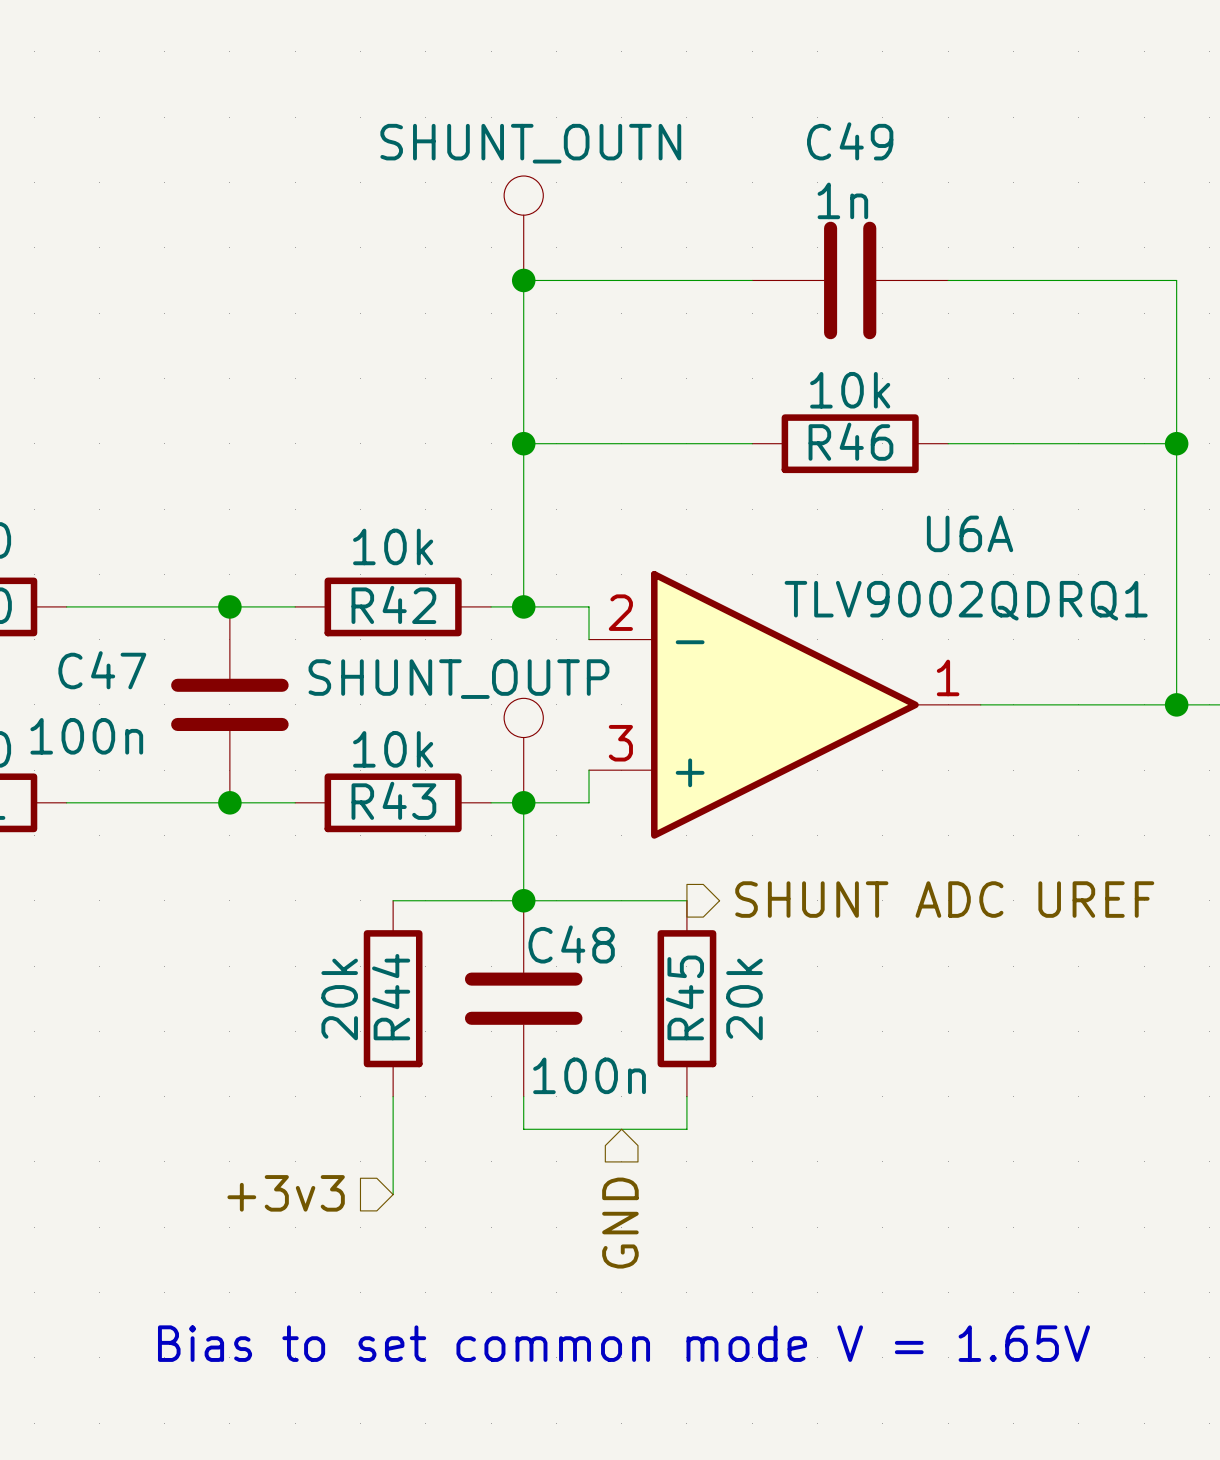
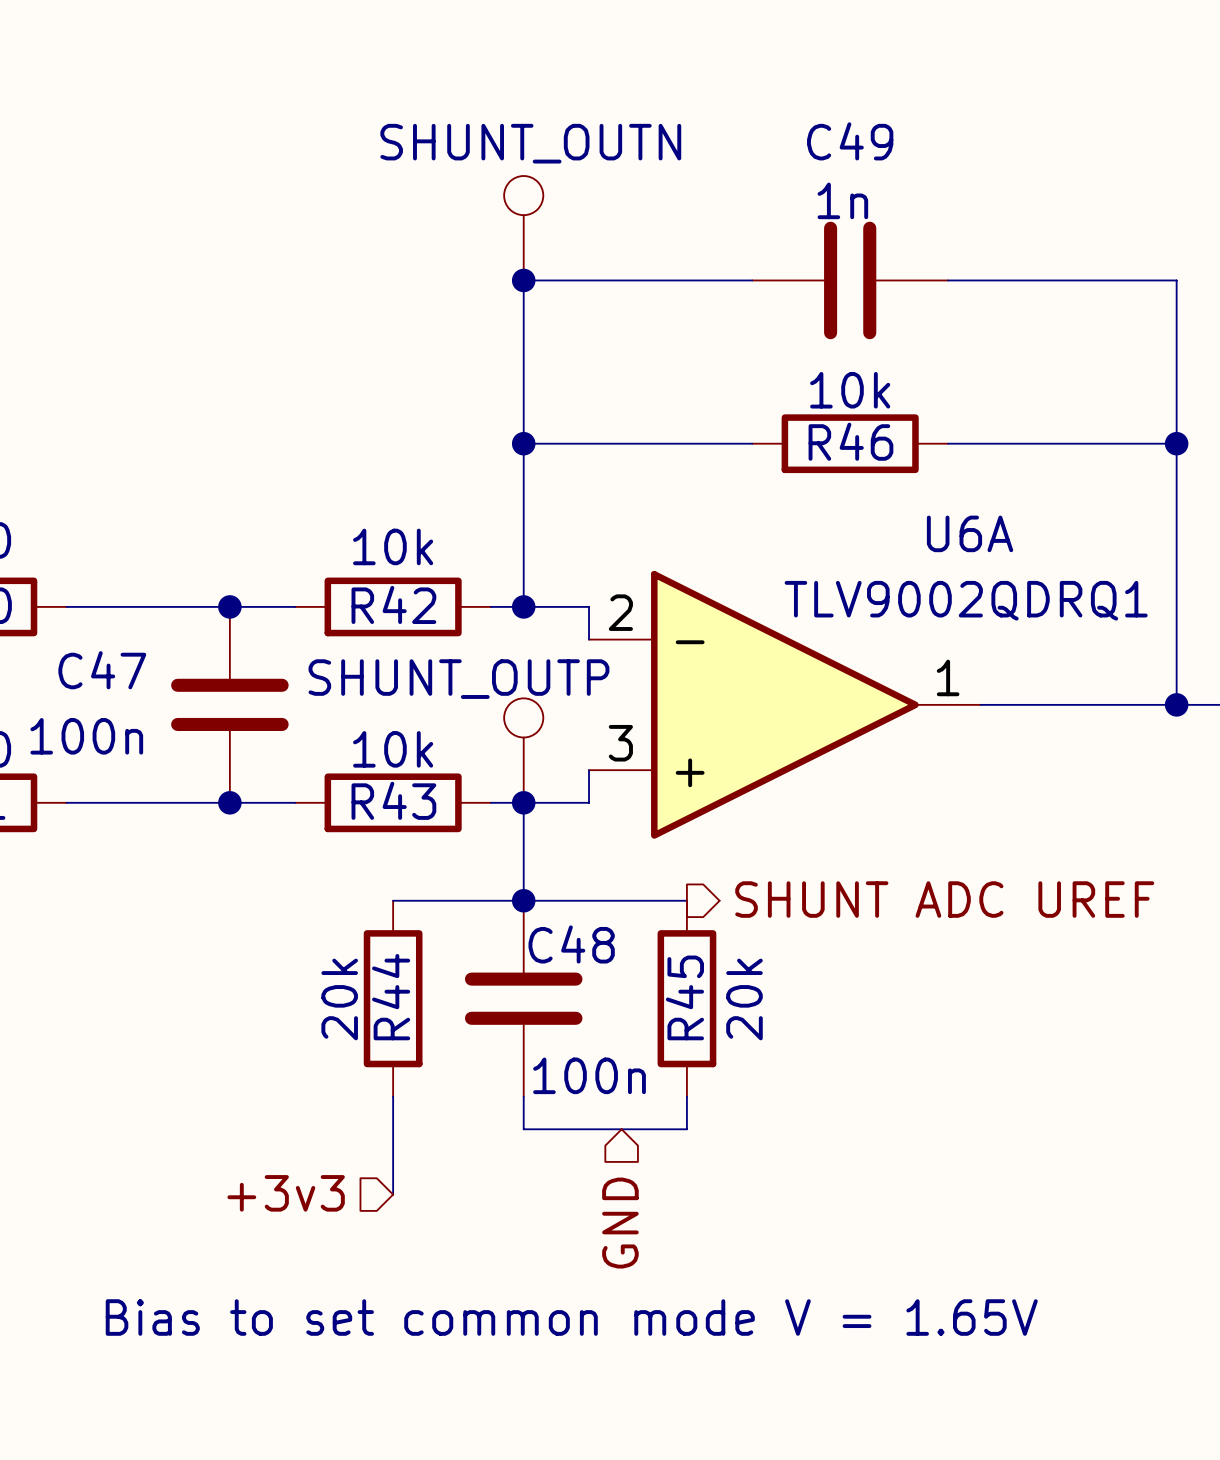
text position: Bias to set common mode V = 1.65V (623, 1343) -> Bias to set common mode V = 1.65V (571, 1317)

